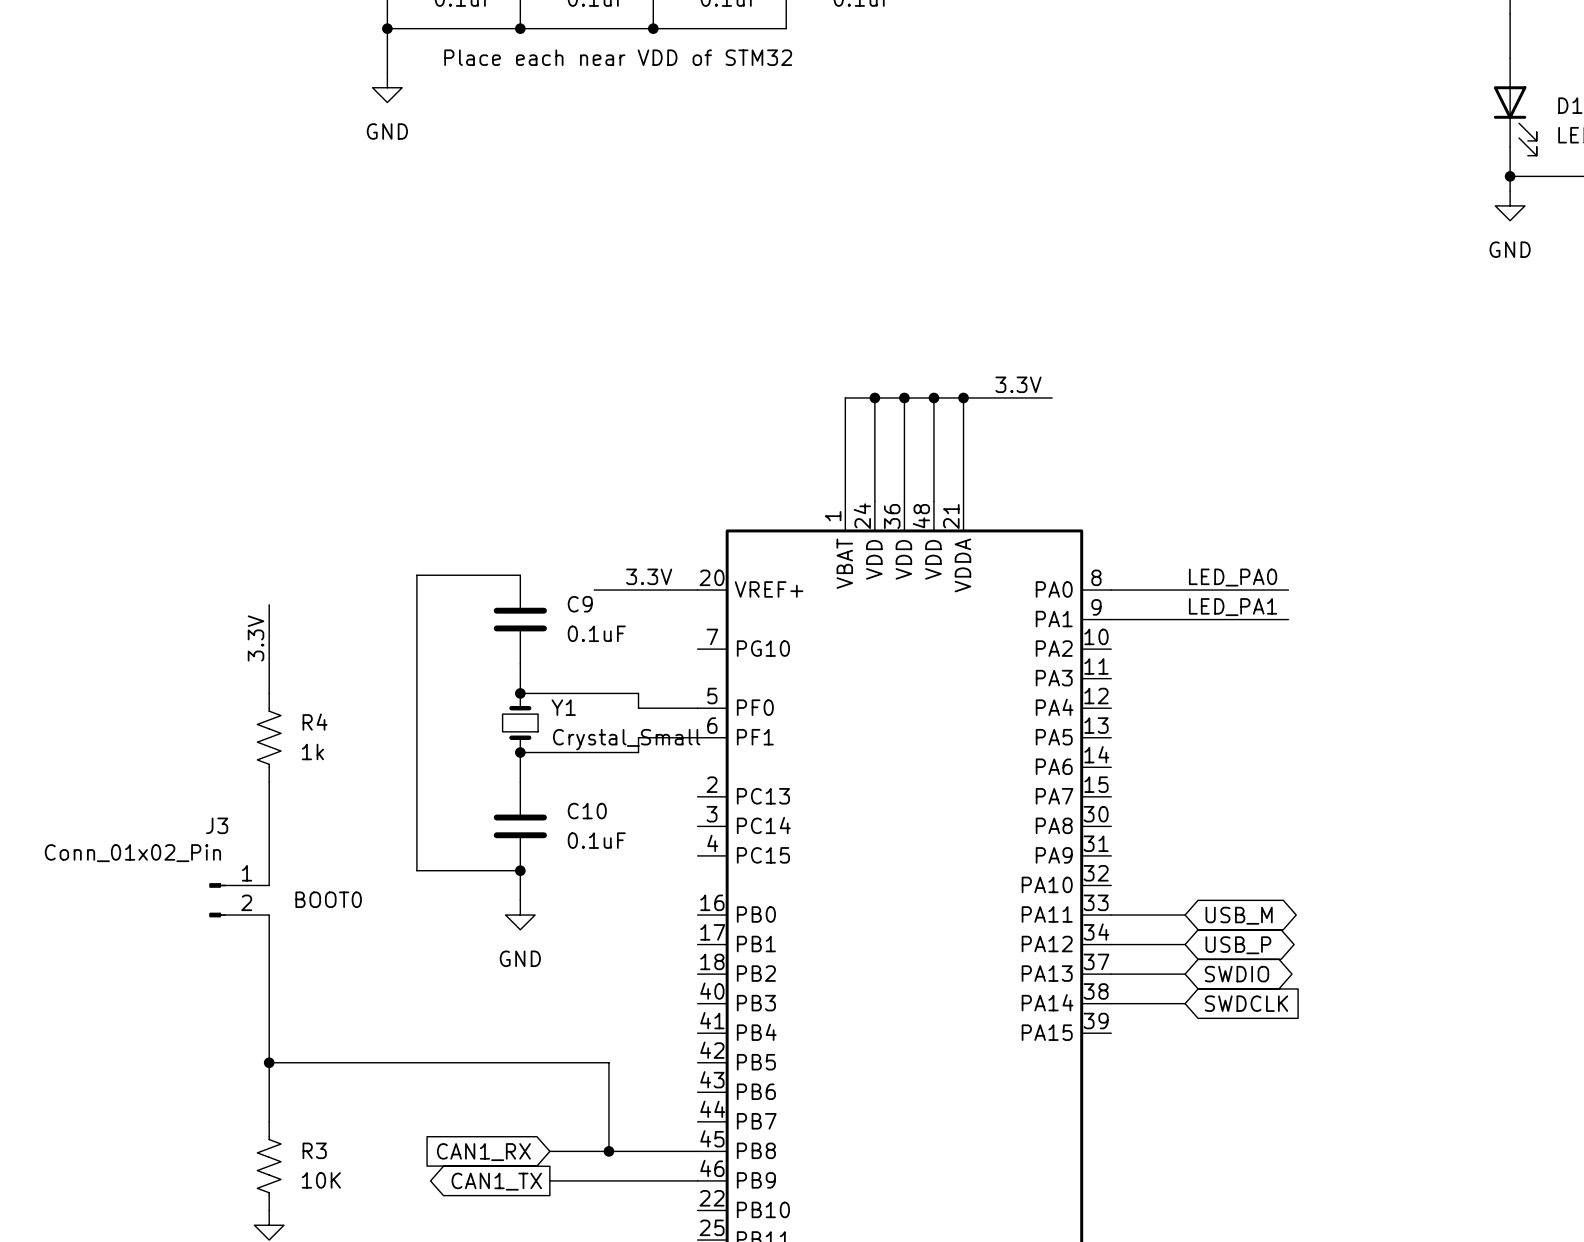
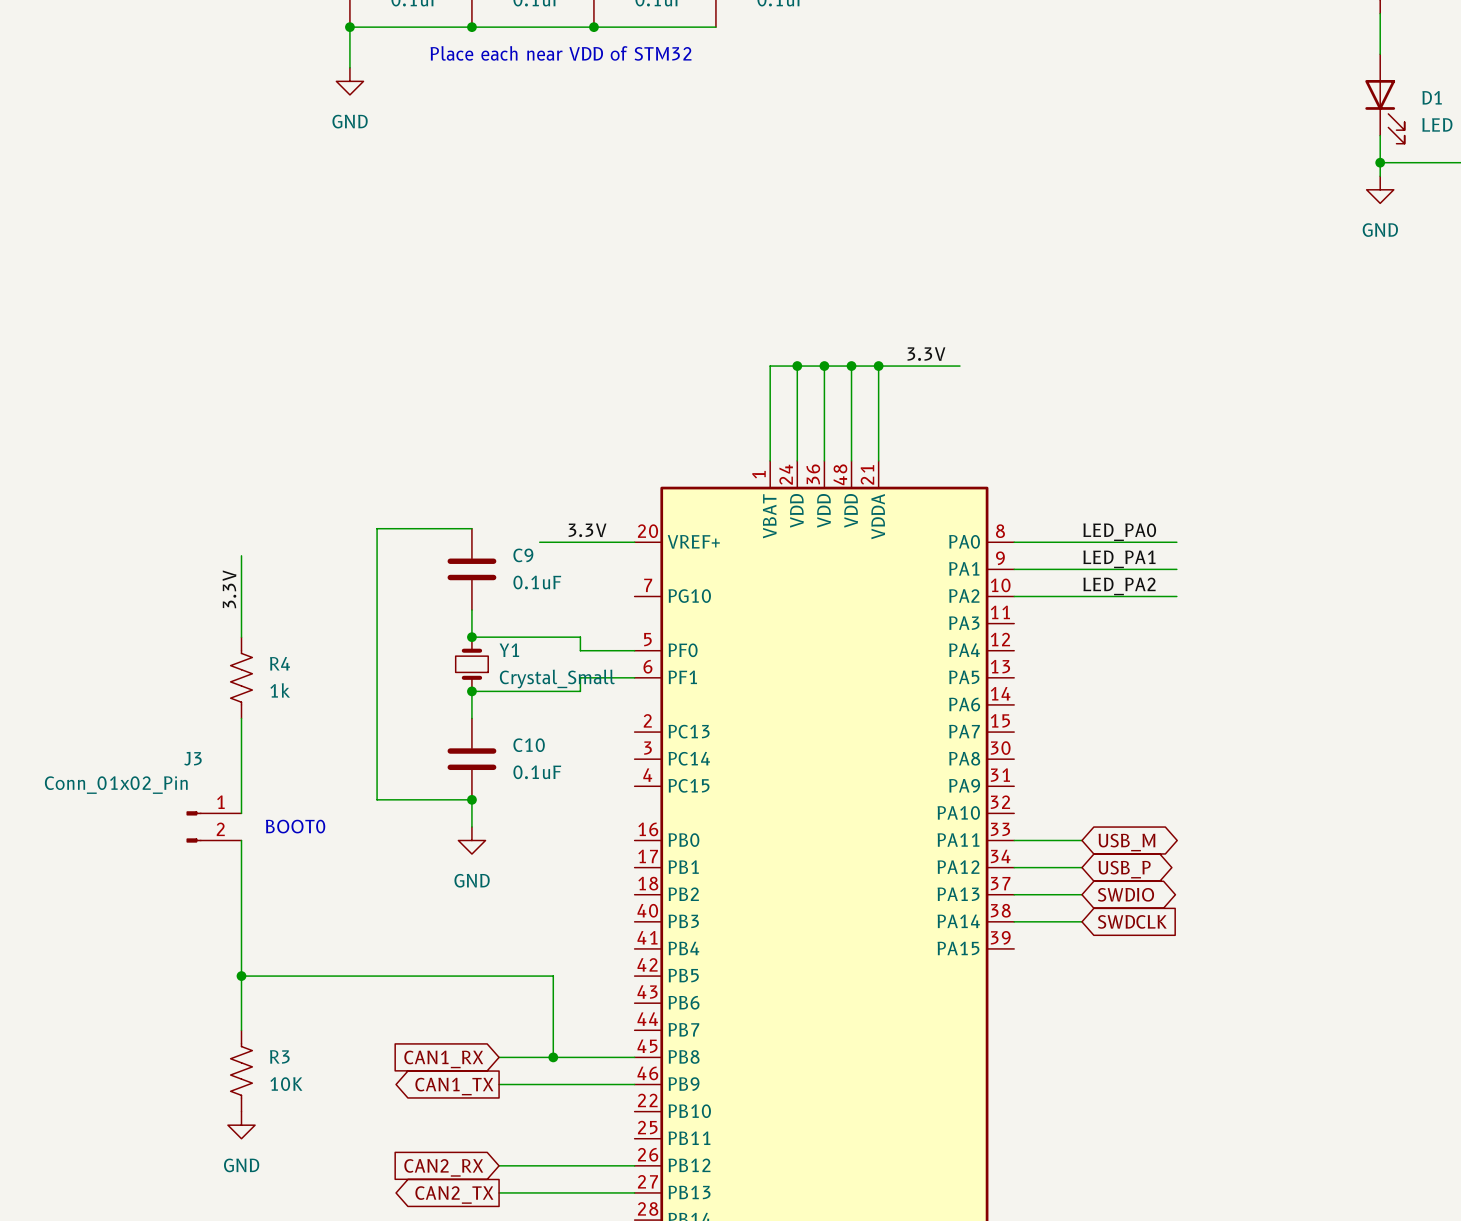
label: none -> LED_PA2 (1119, 586)
wire: none -> (1014, 596) (1176, 596)

